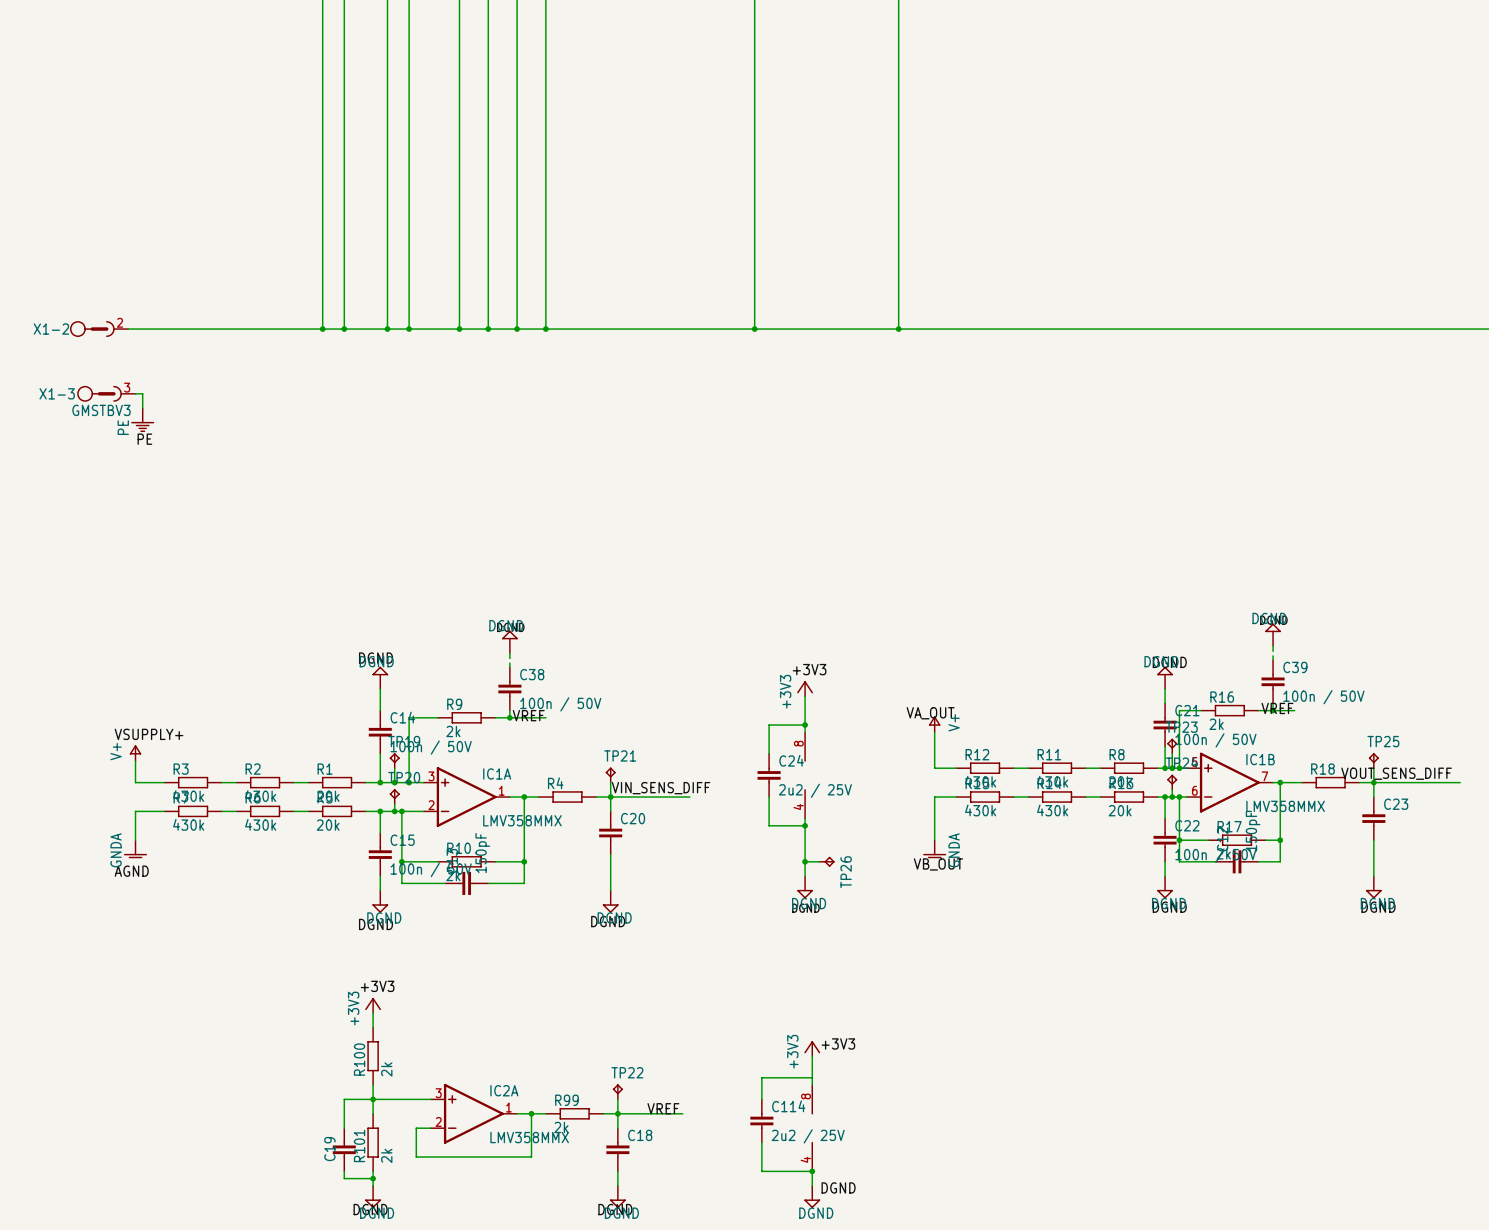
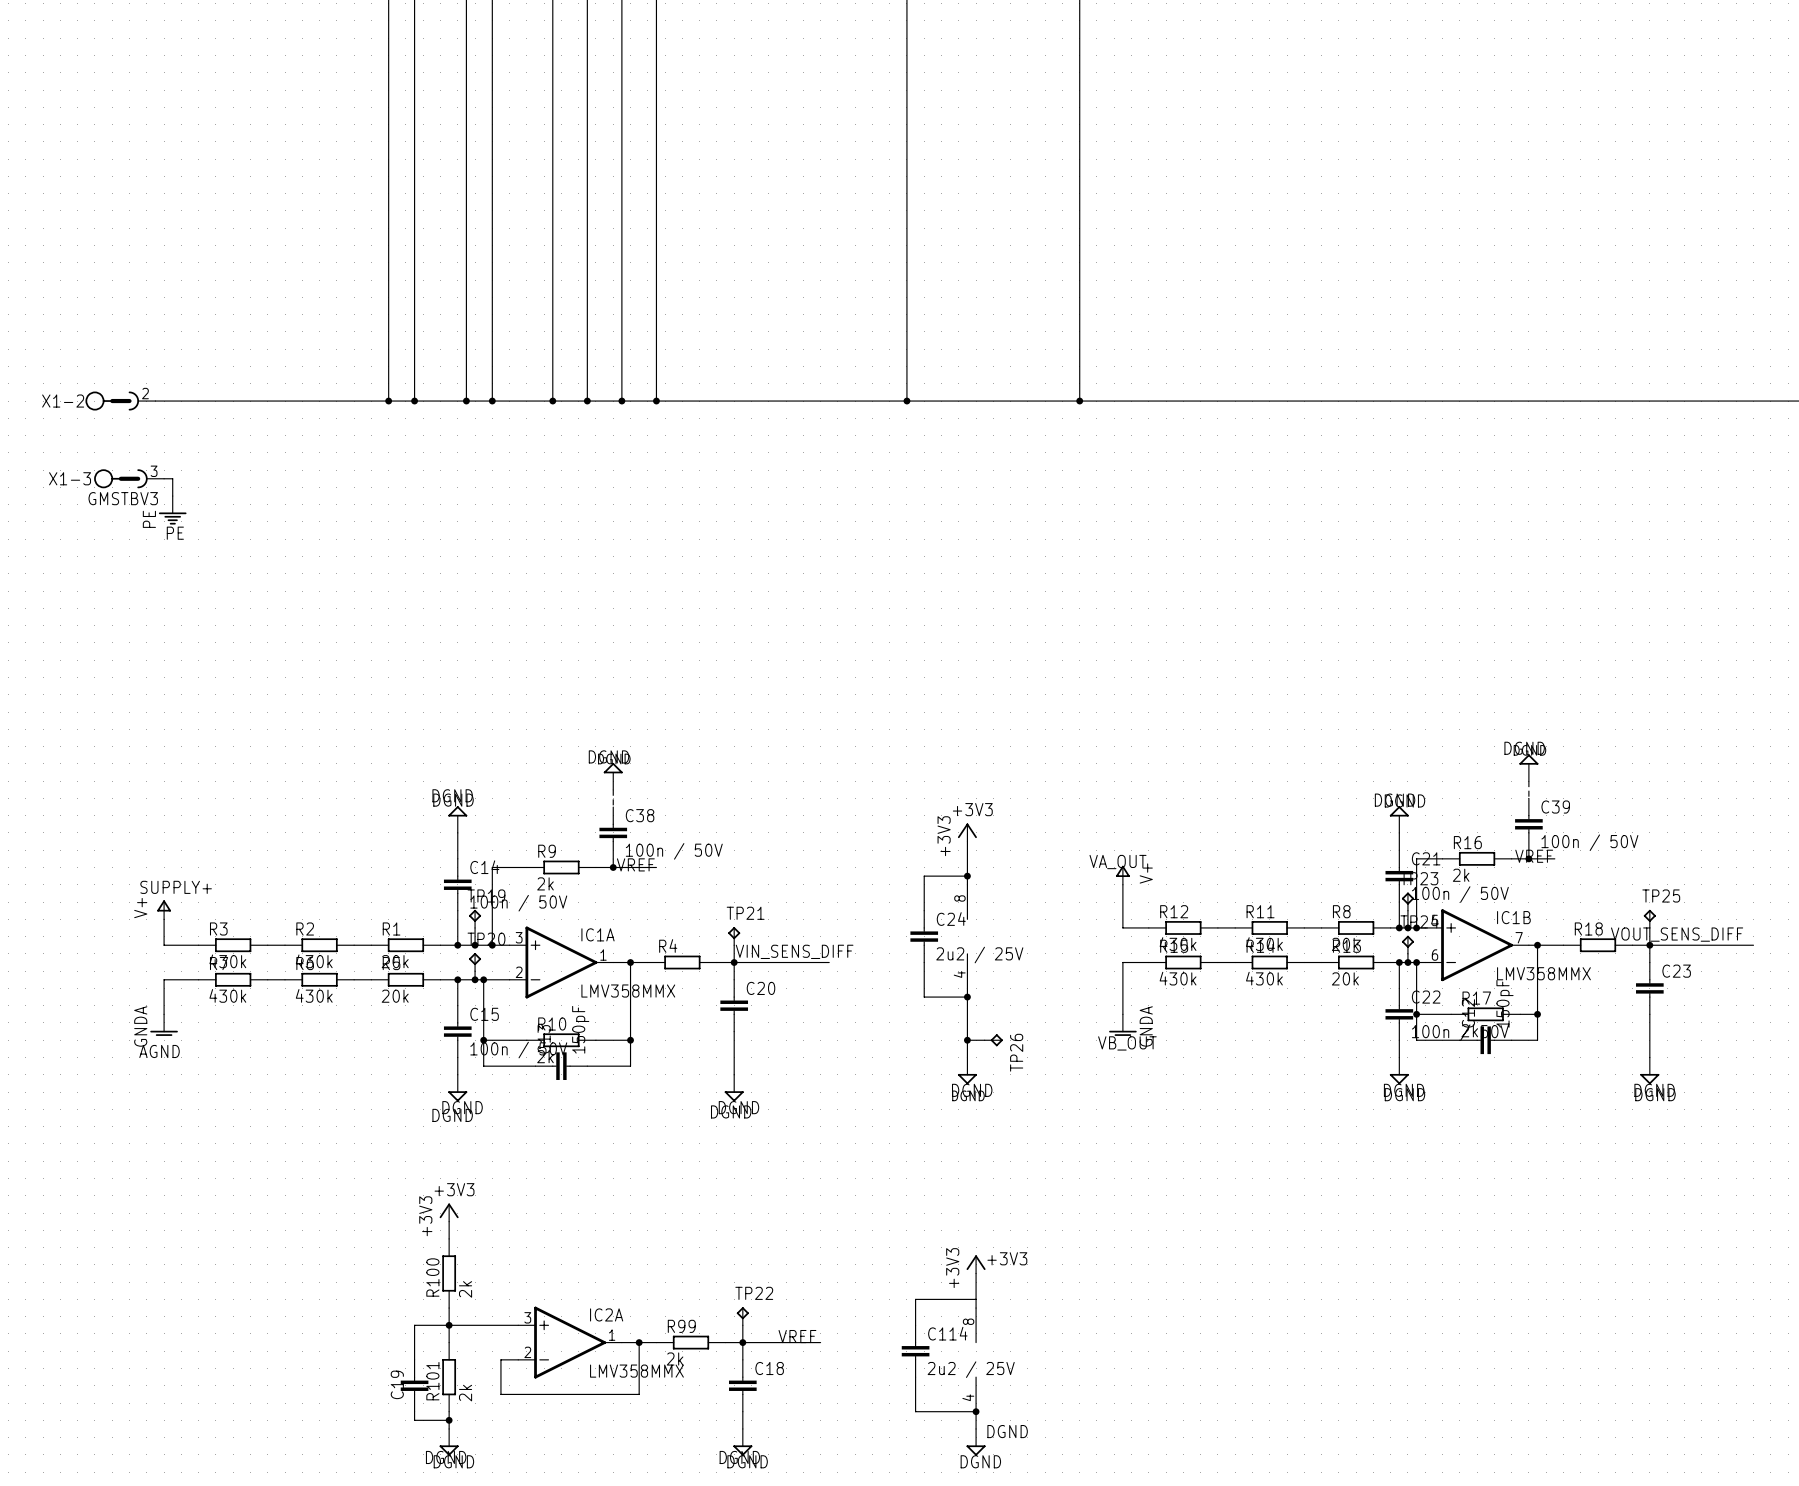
label: VSUPPLY+ (149, 734) -> SUPPLY+ (176, 887)

